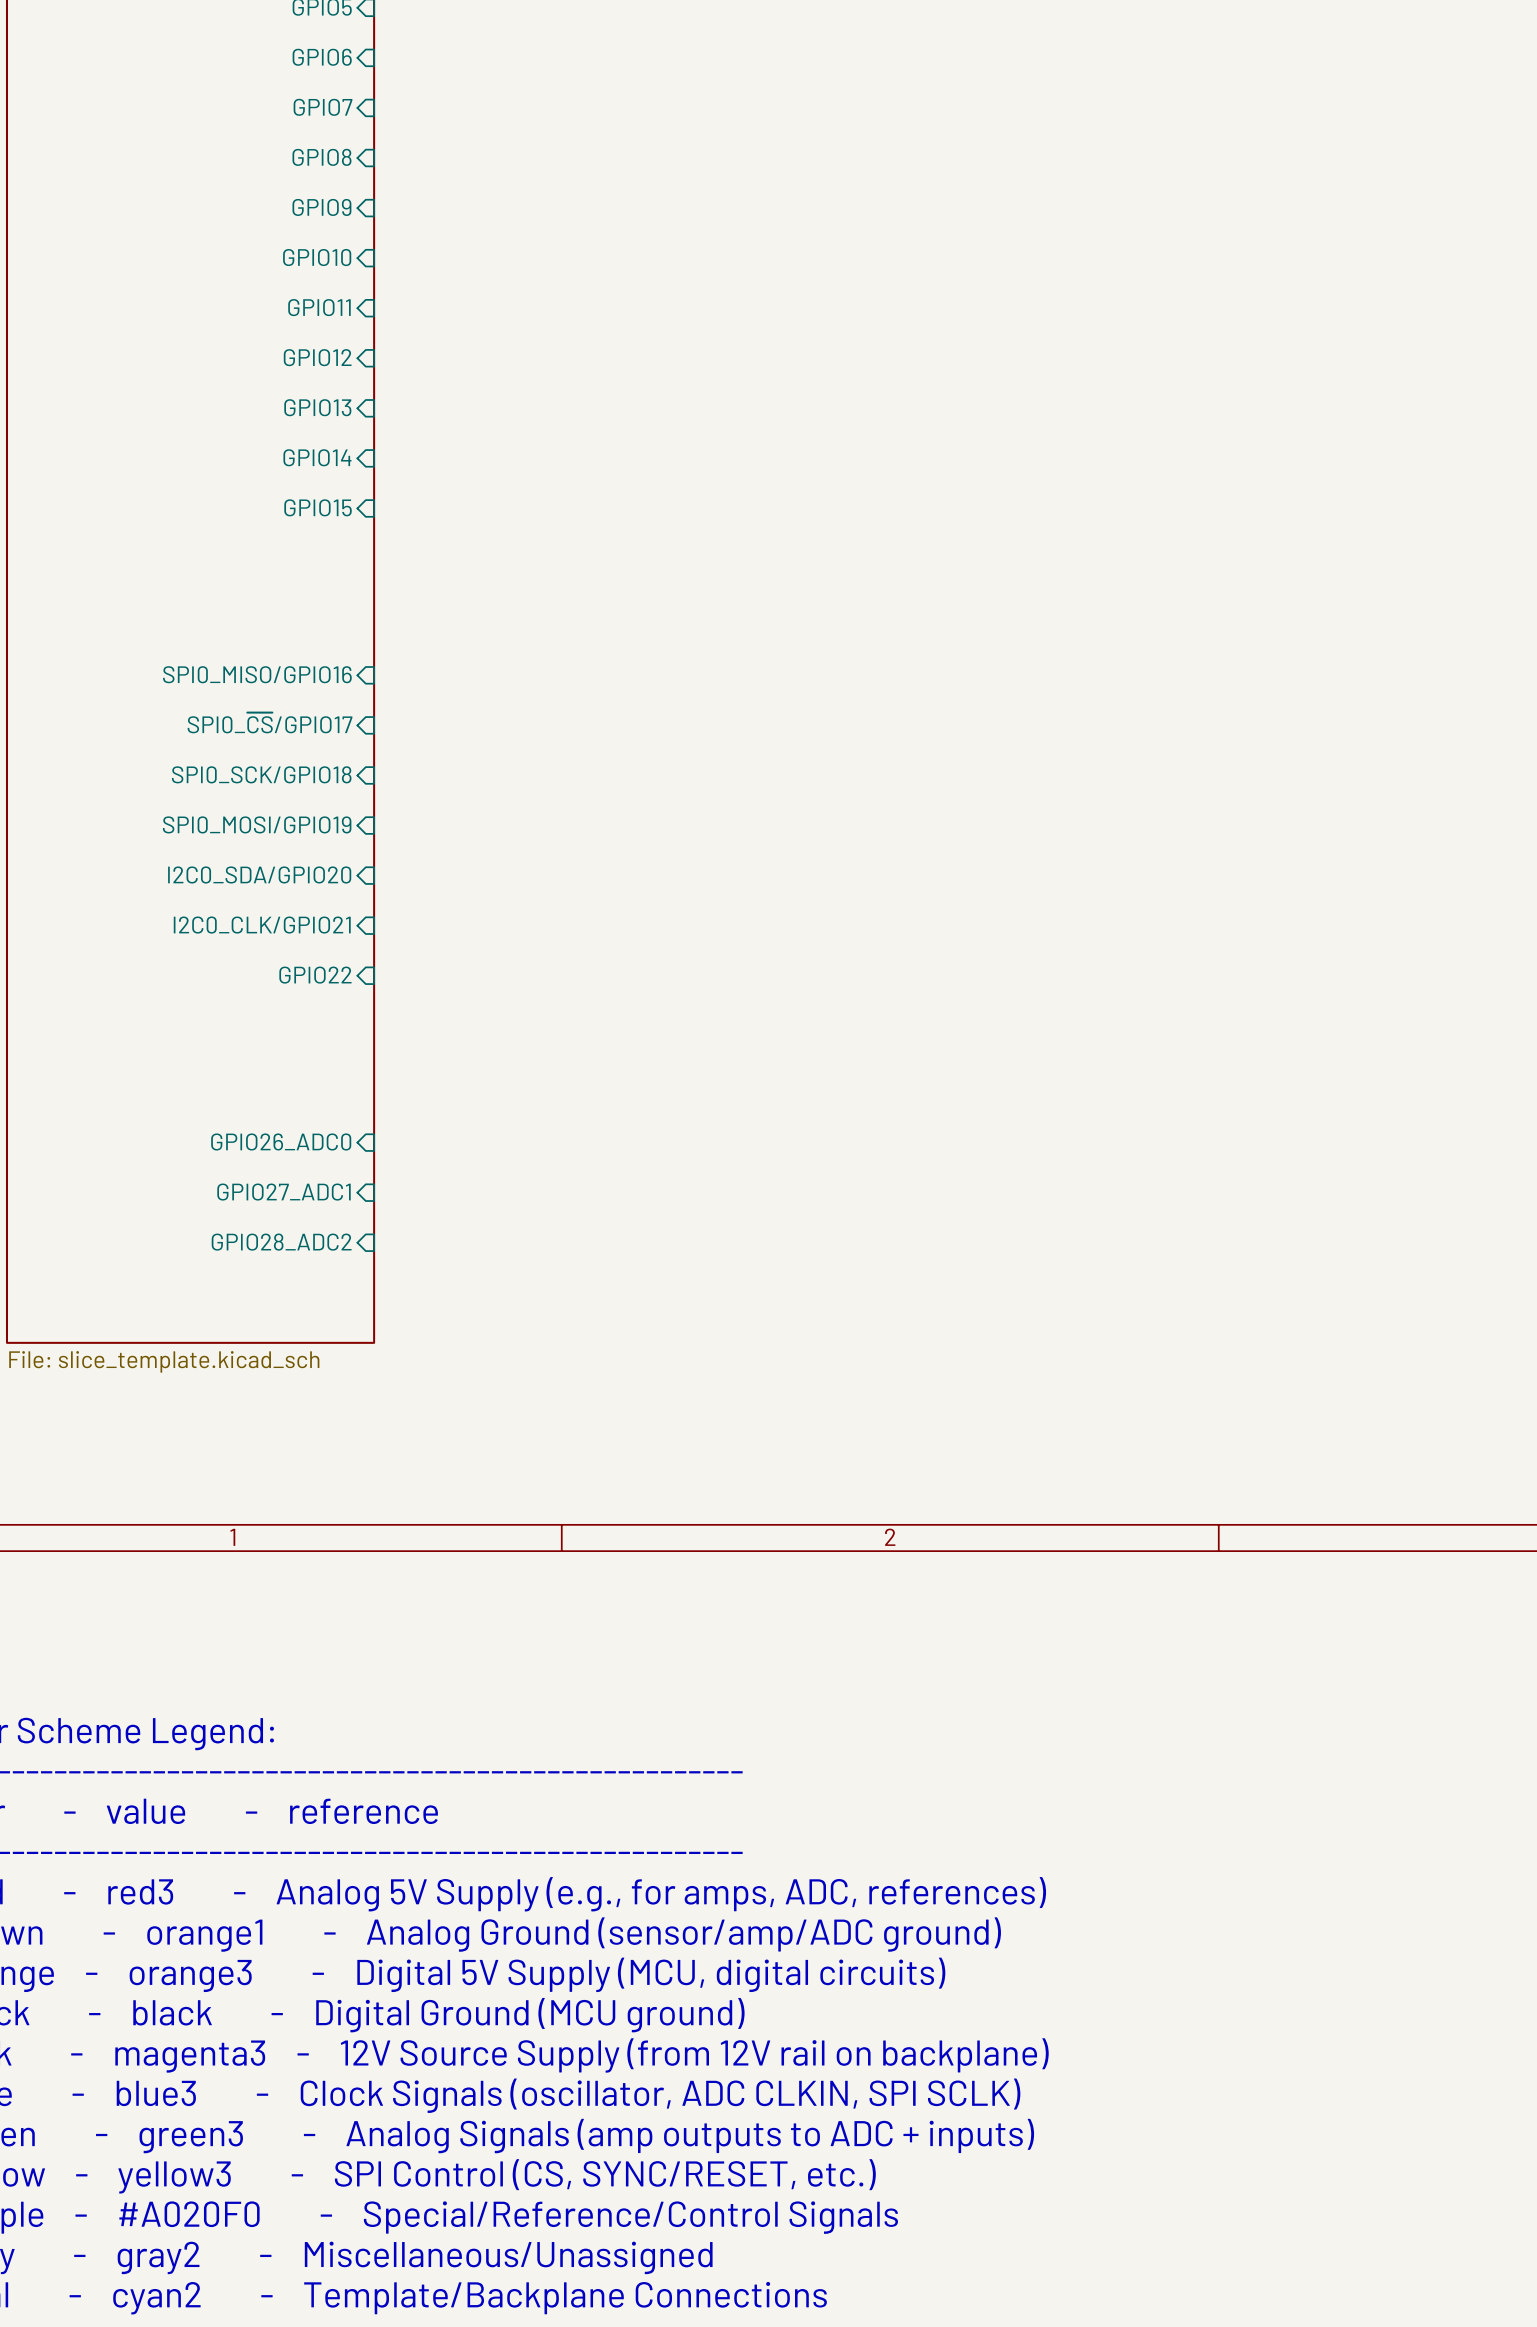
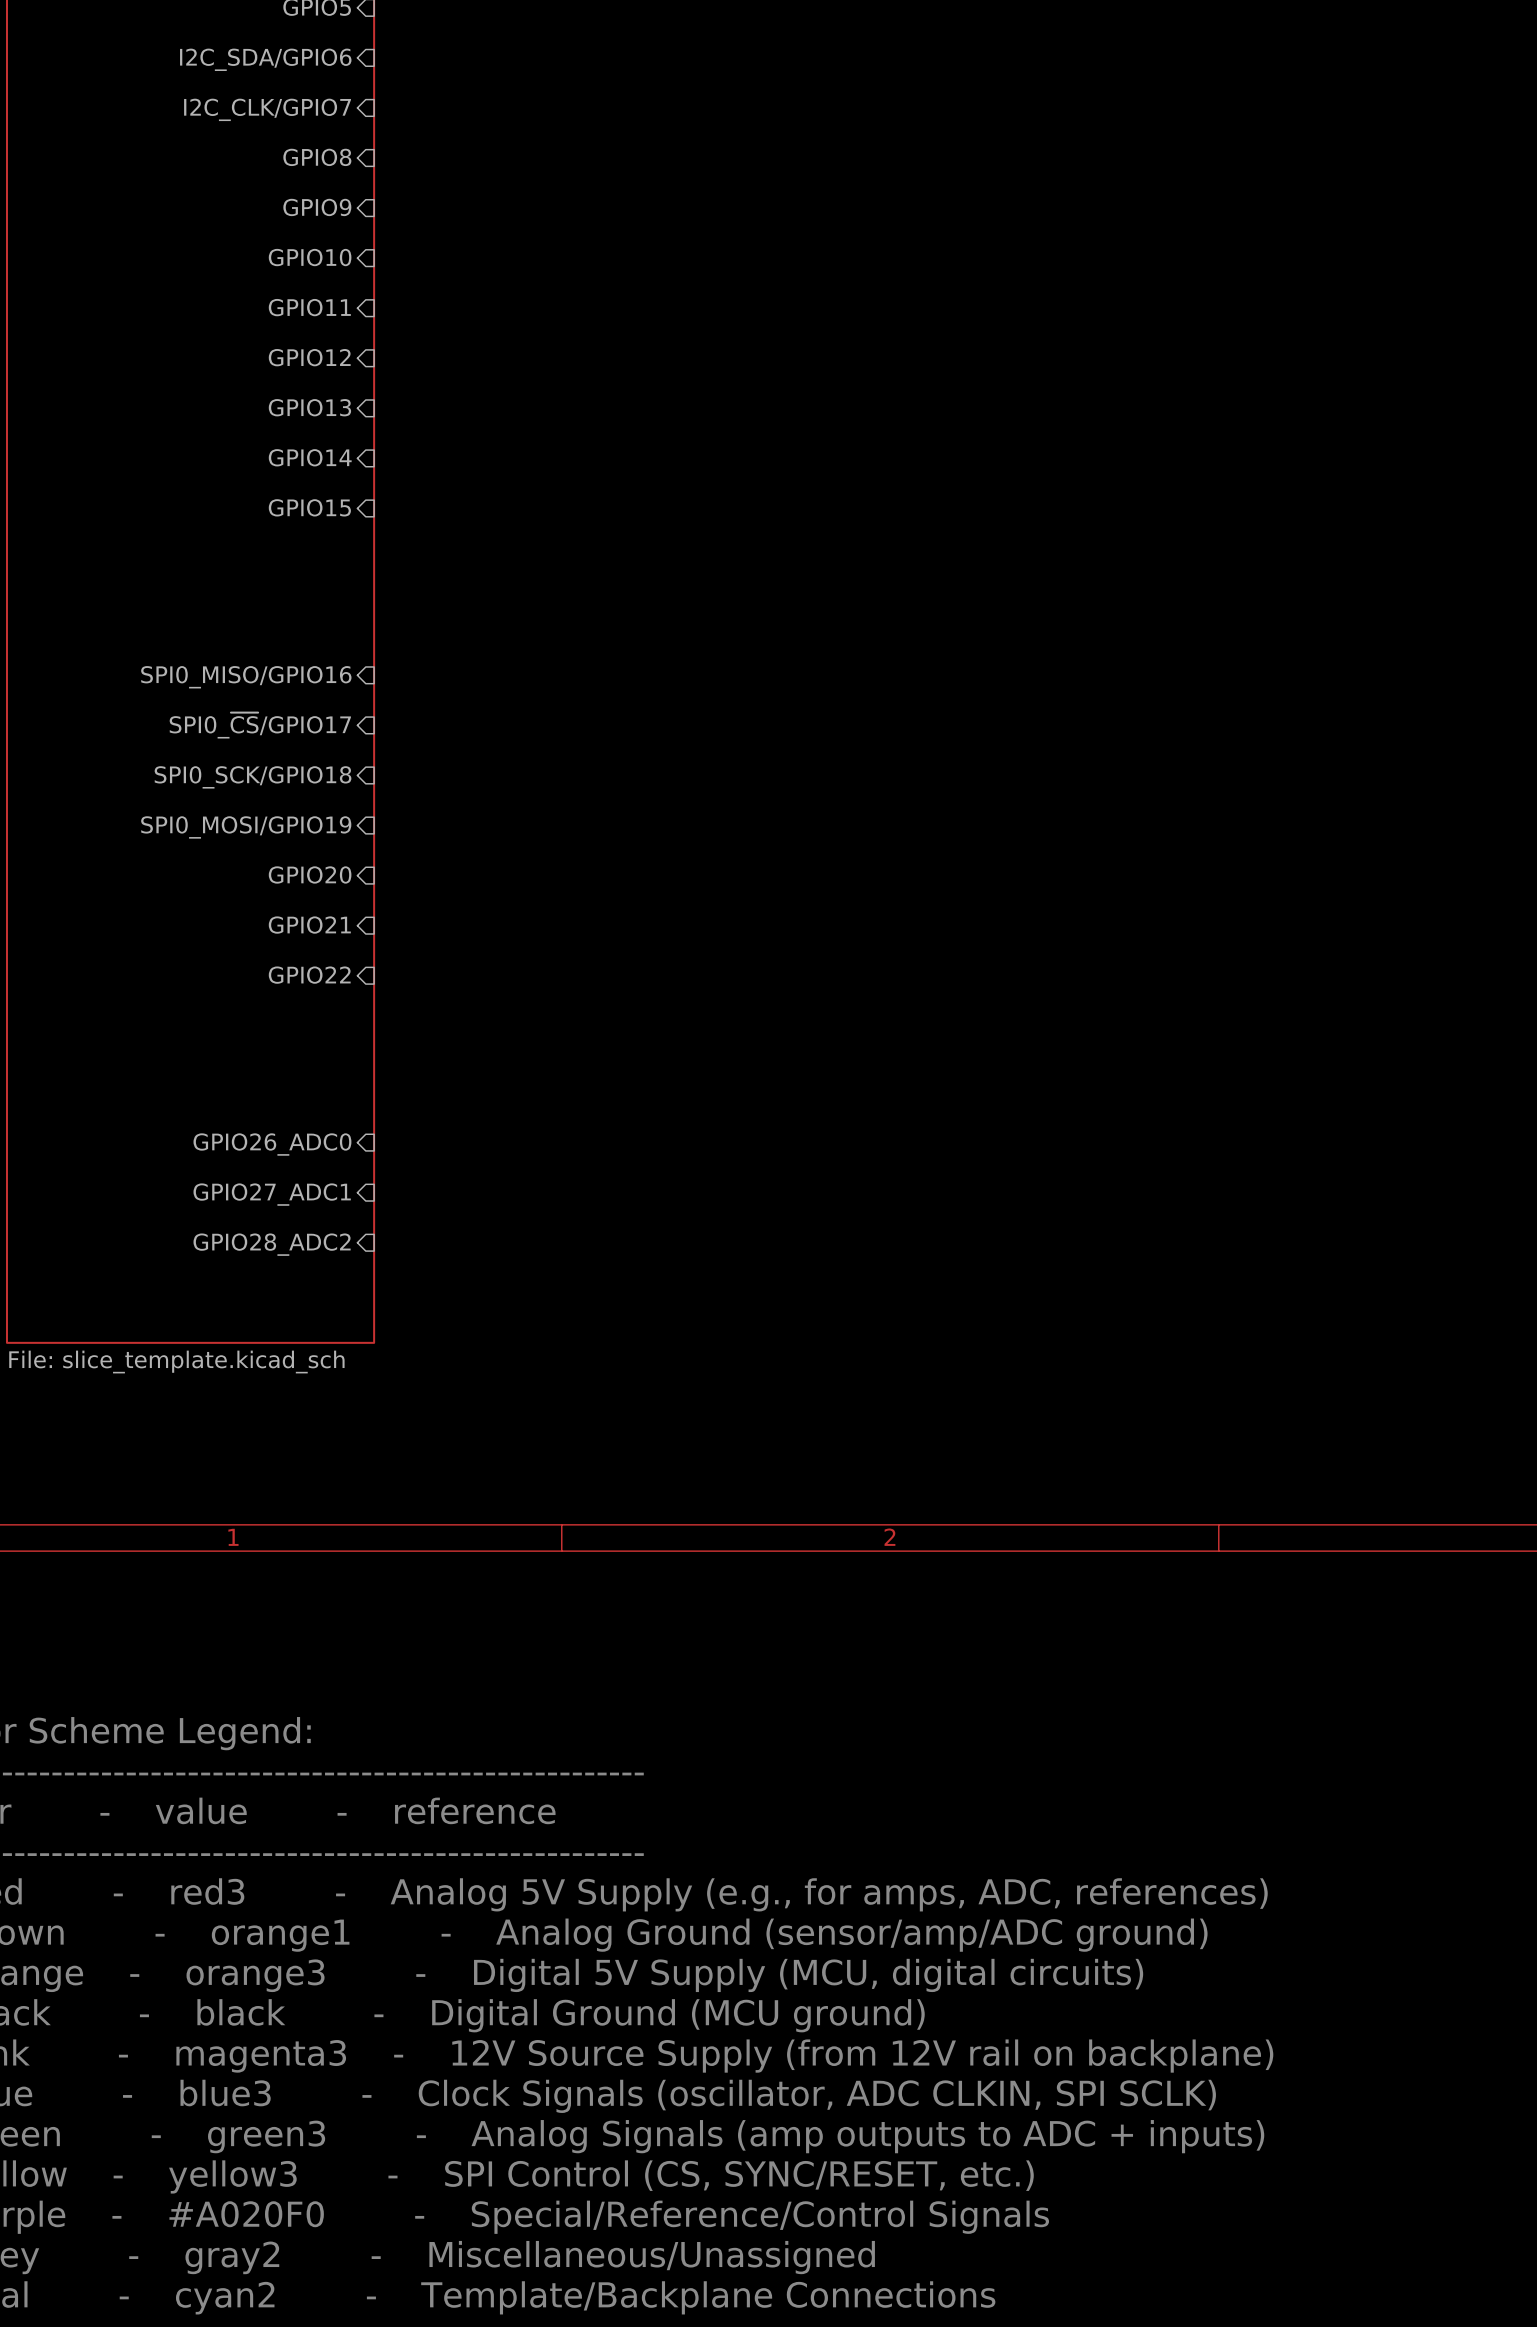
sheet pin: GPIO6 (322, 57) -> I2C_SDA/GPIO6 (265, 59)
sheet pin: GPIO7 (323, 107) -> I2C_CLK/GPIO7 (267, 109)
sheet pin: I2C0_SDA/GPIO20 (259, 874) -> GPIO20 (310, 874)
sheet pin: I2C0_CLK/GPIO21 (262, 925) -> GPIO21 (309, 925)

